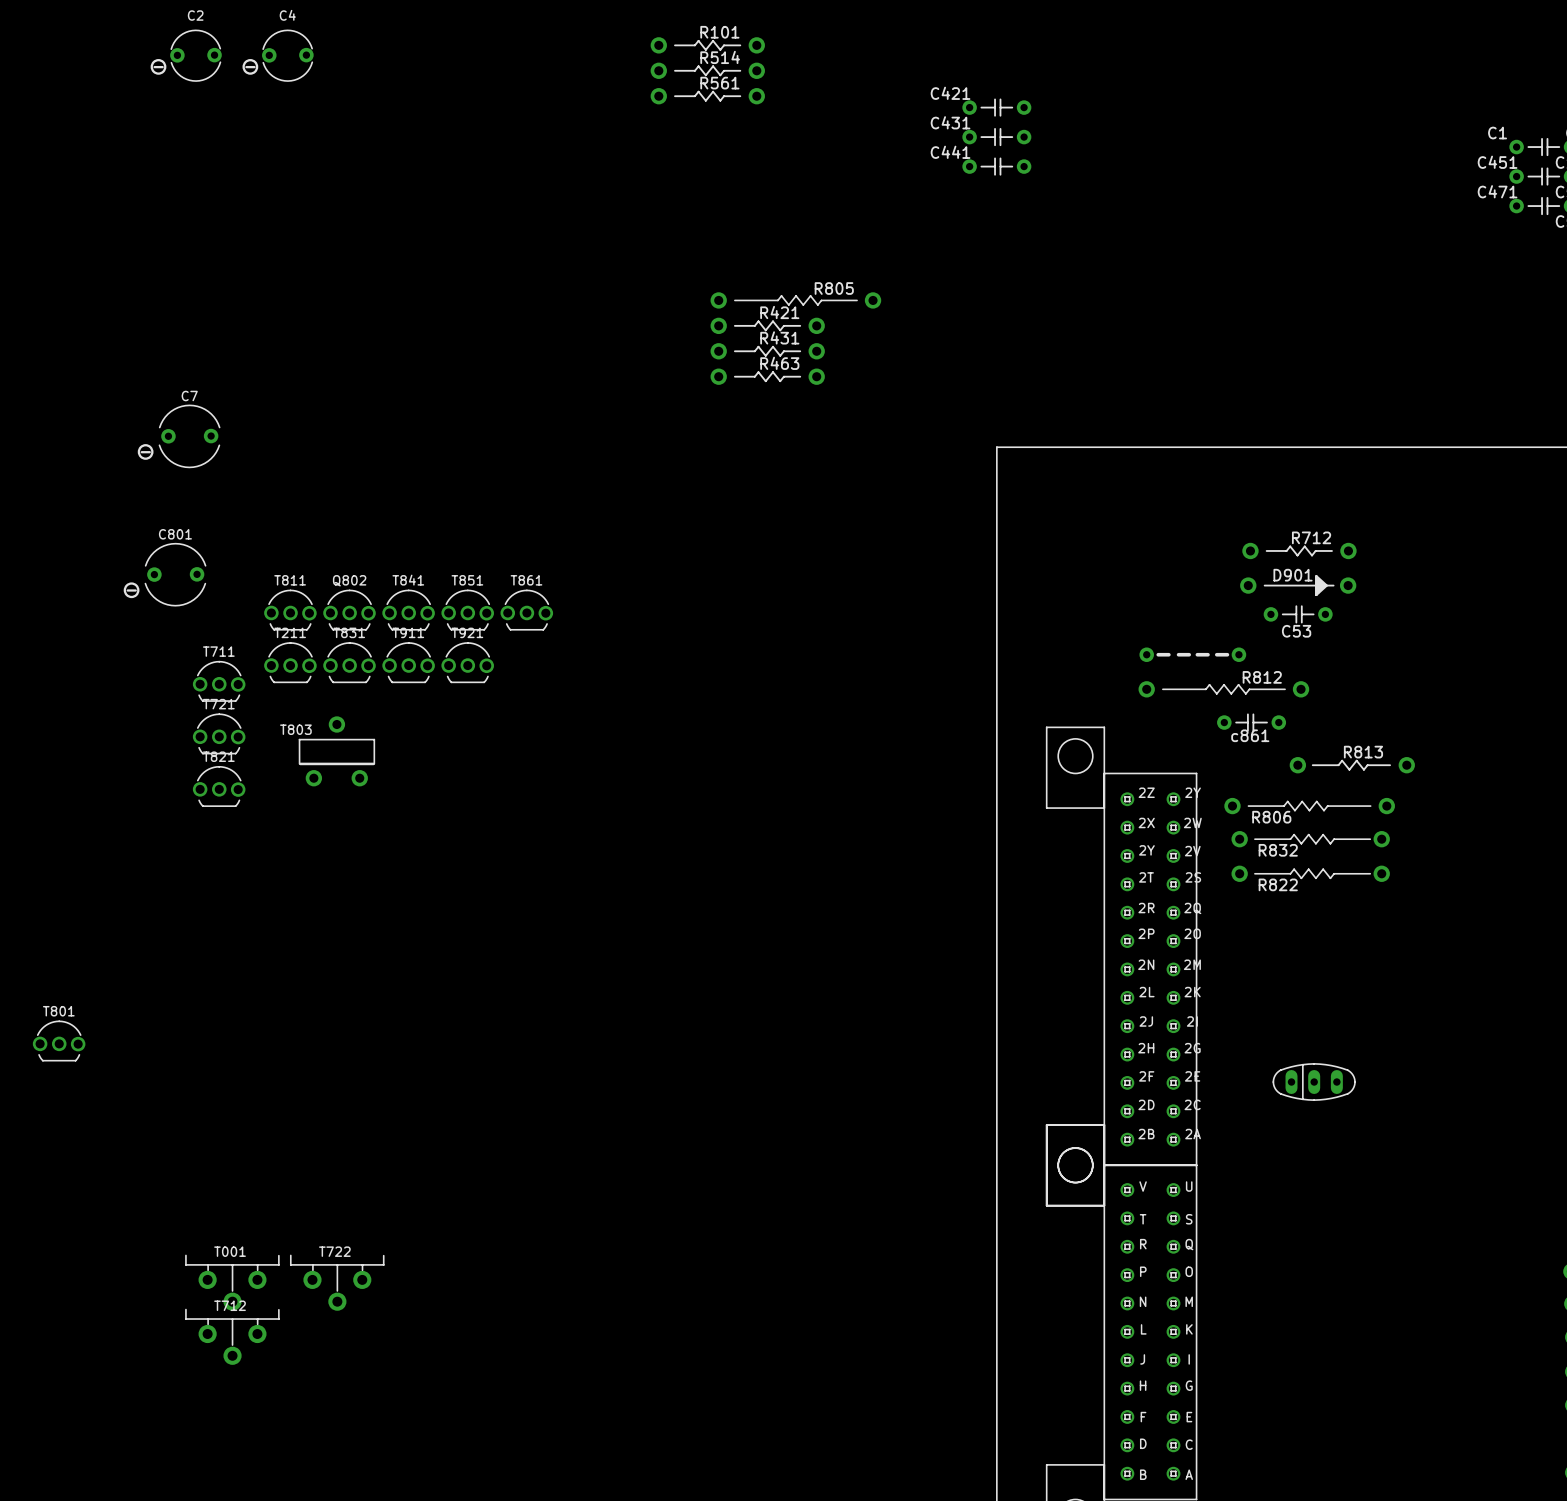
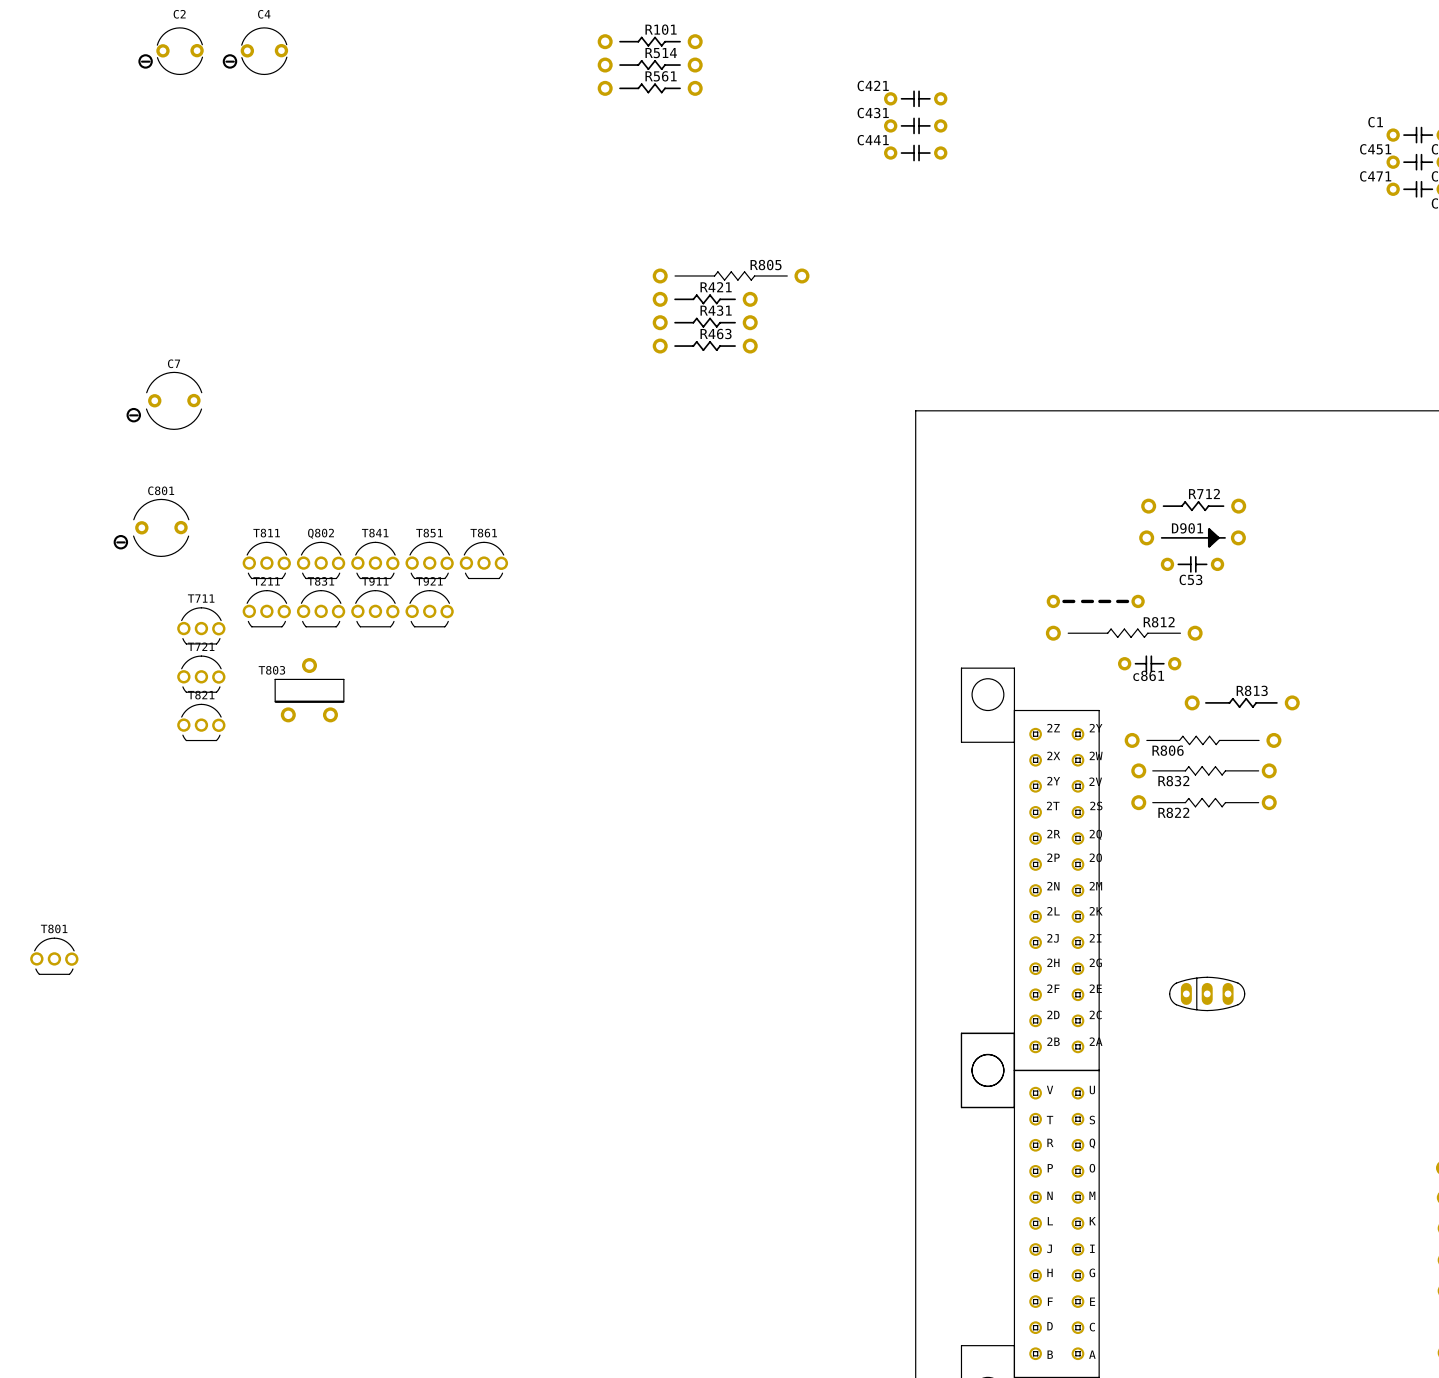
T001: (232, 1282) -> none
T722: (337, 1282) -> none
T712: (232, 1336) -> none

